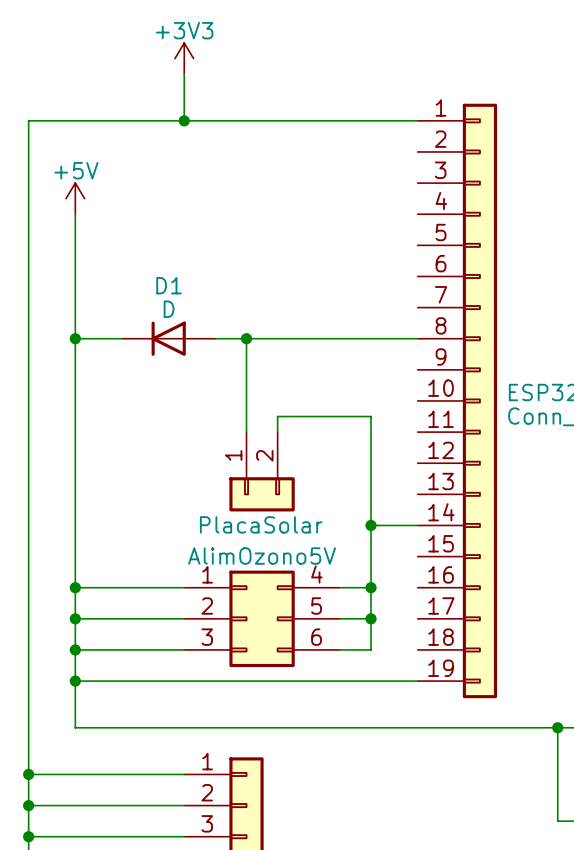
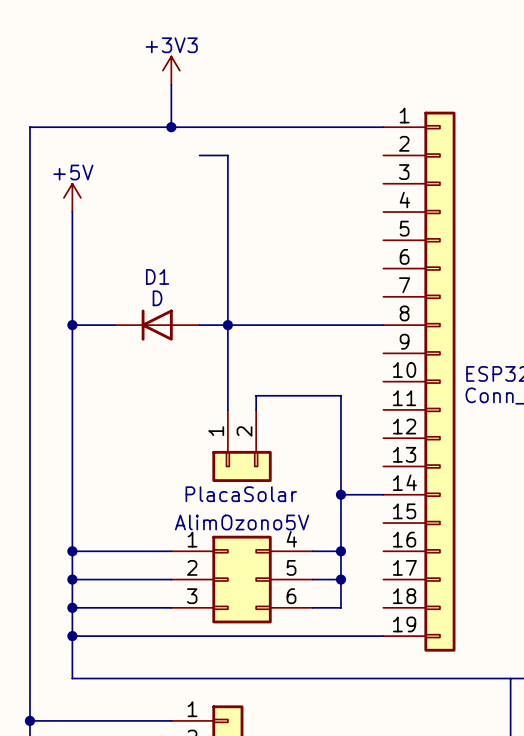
wire: none -> (199, 155) (227, 155) (227, 325)
junction: (557, 727) -> none

